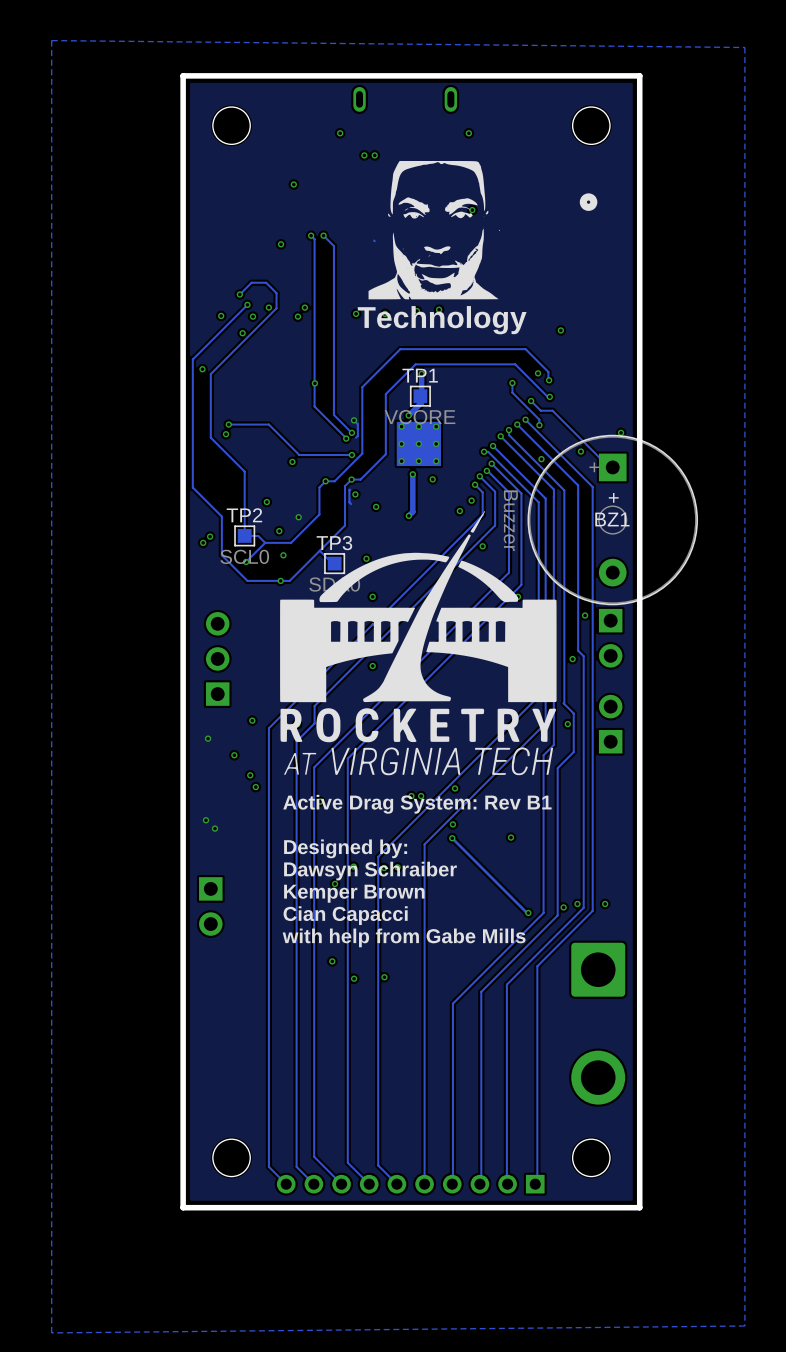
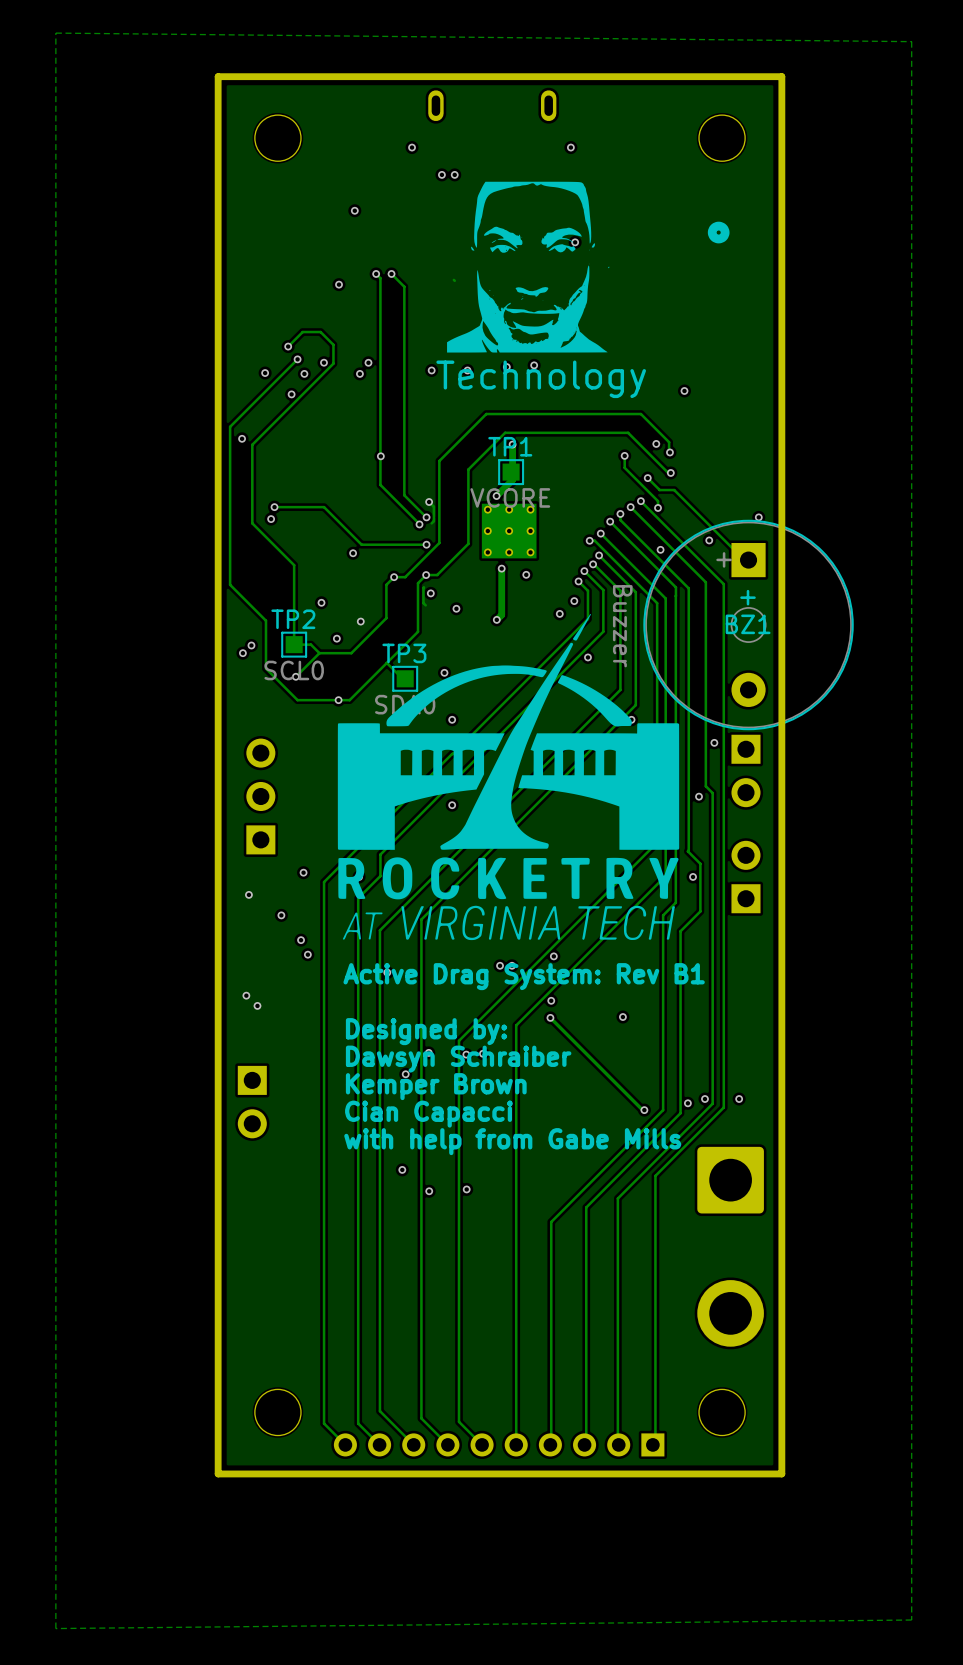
via: (283, 555) -> none

